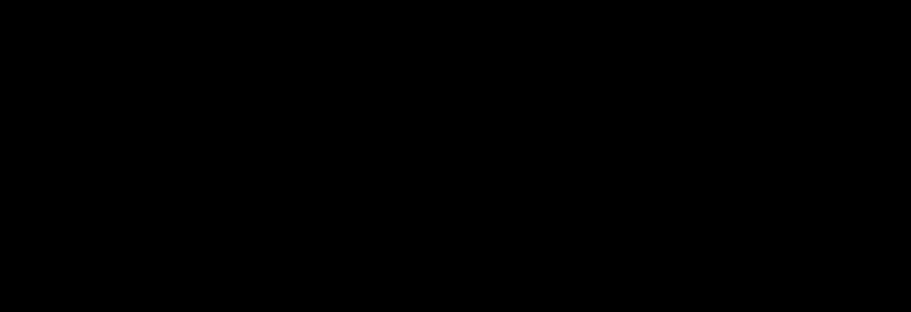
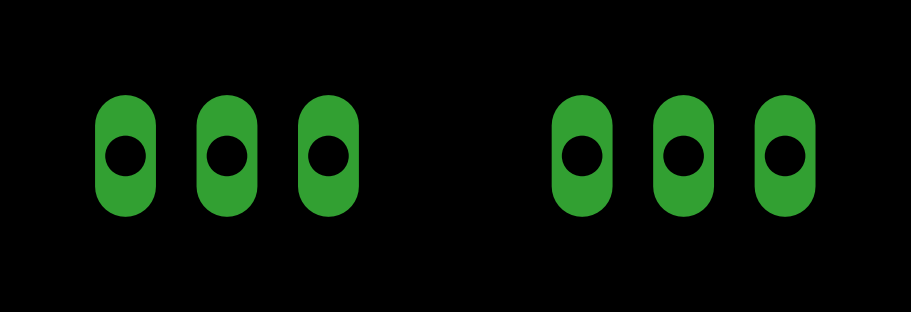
part: none -> (226, 155)
part: none -> (683, 155)

